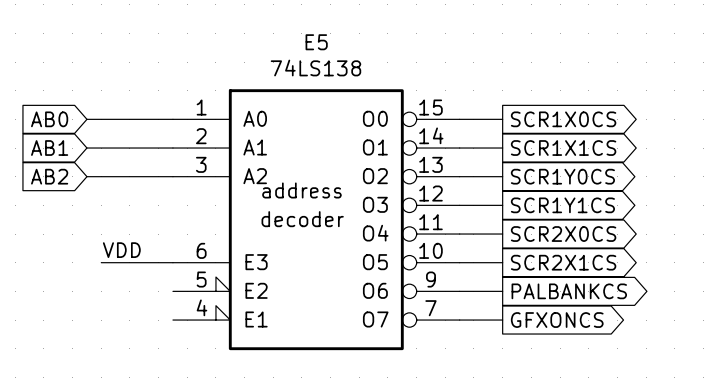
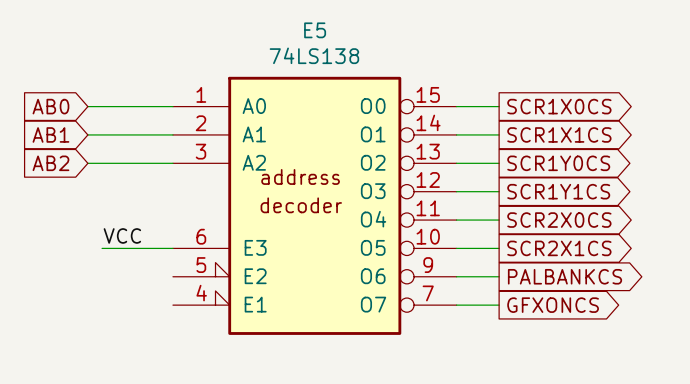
label: VDD (121, 250) -> VCC (122, 235)

